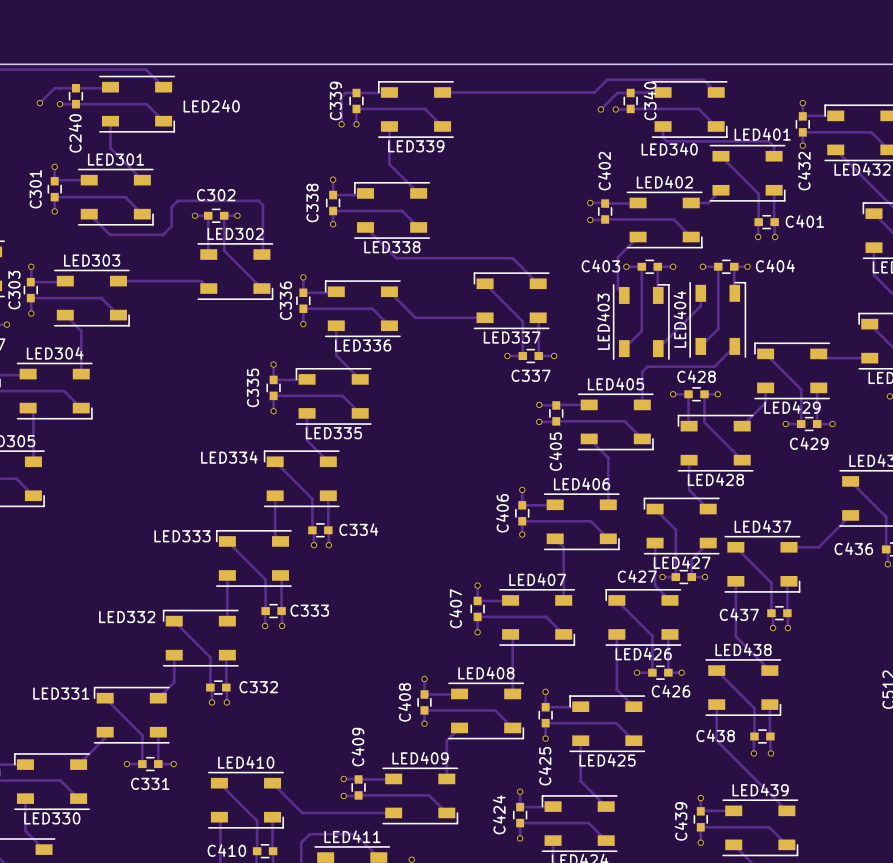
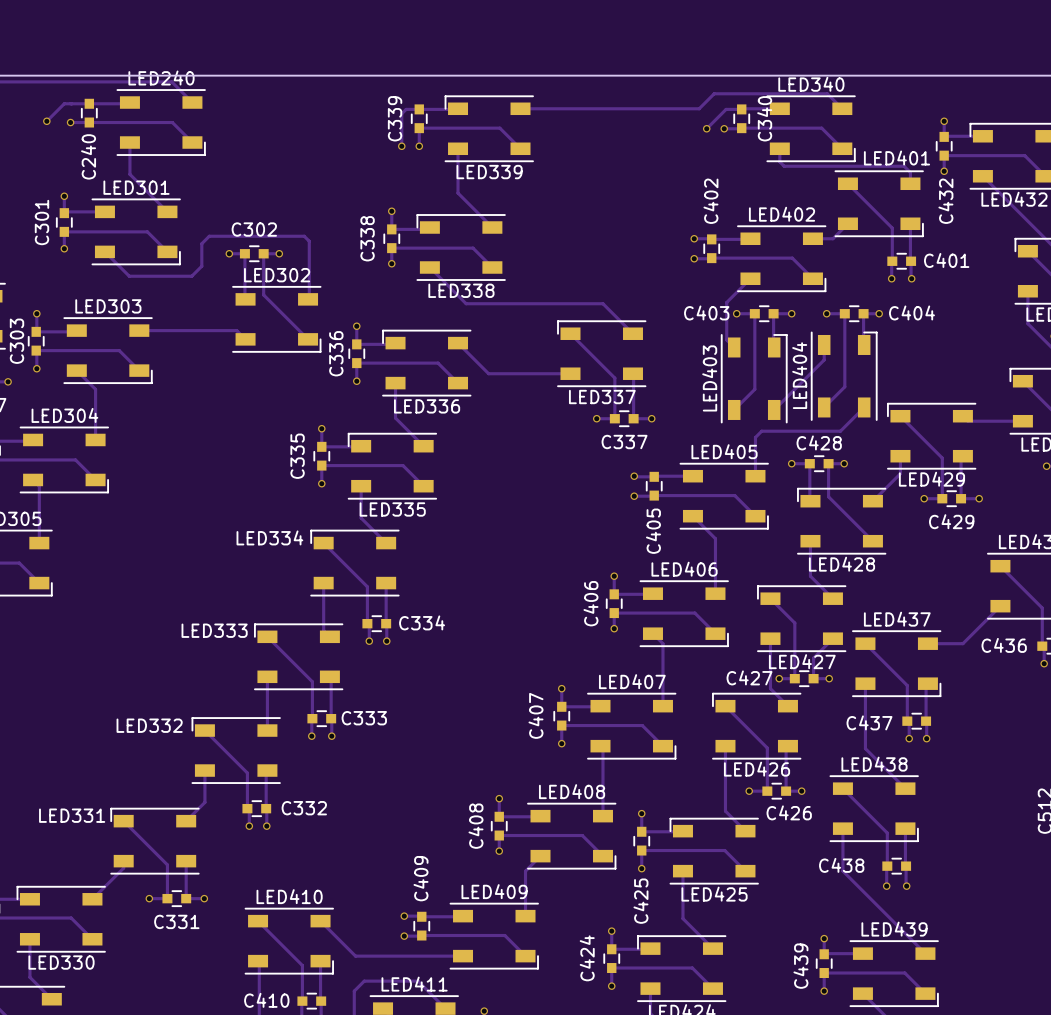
LED240 name position: LED240 (211, 106) -> LED240 (161, 78)
LED340 name position: LED340 (669, 149) -> LED340 (811, 84)

